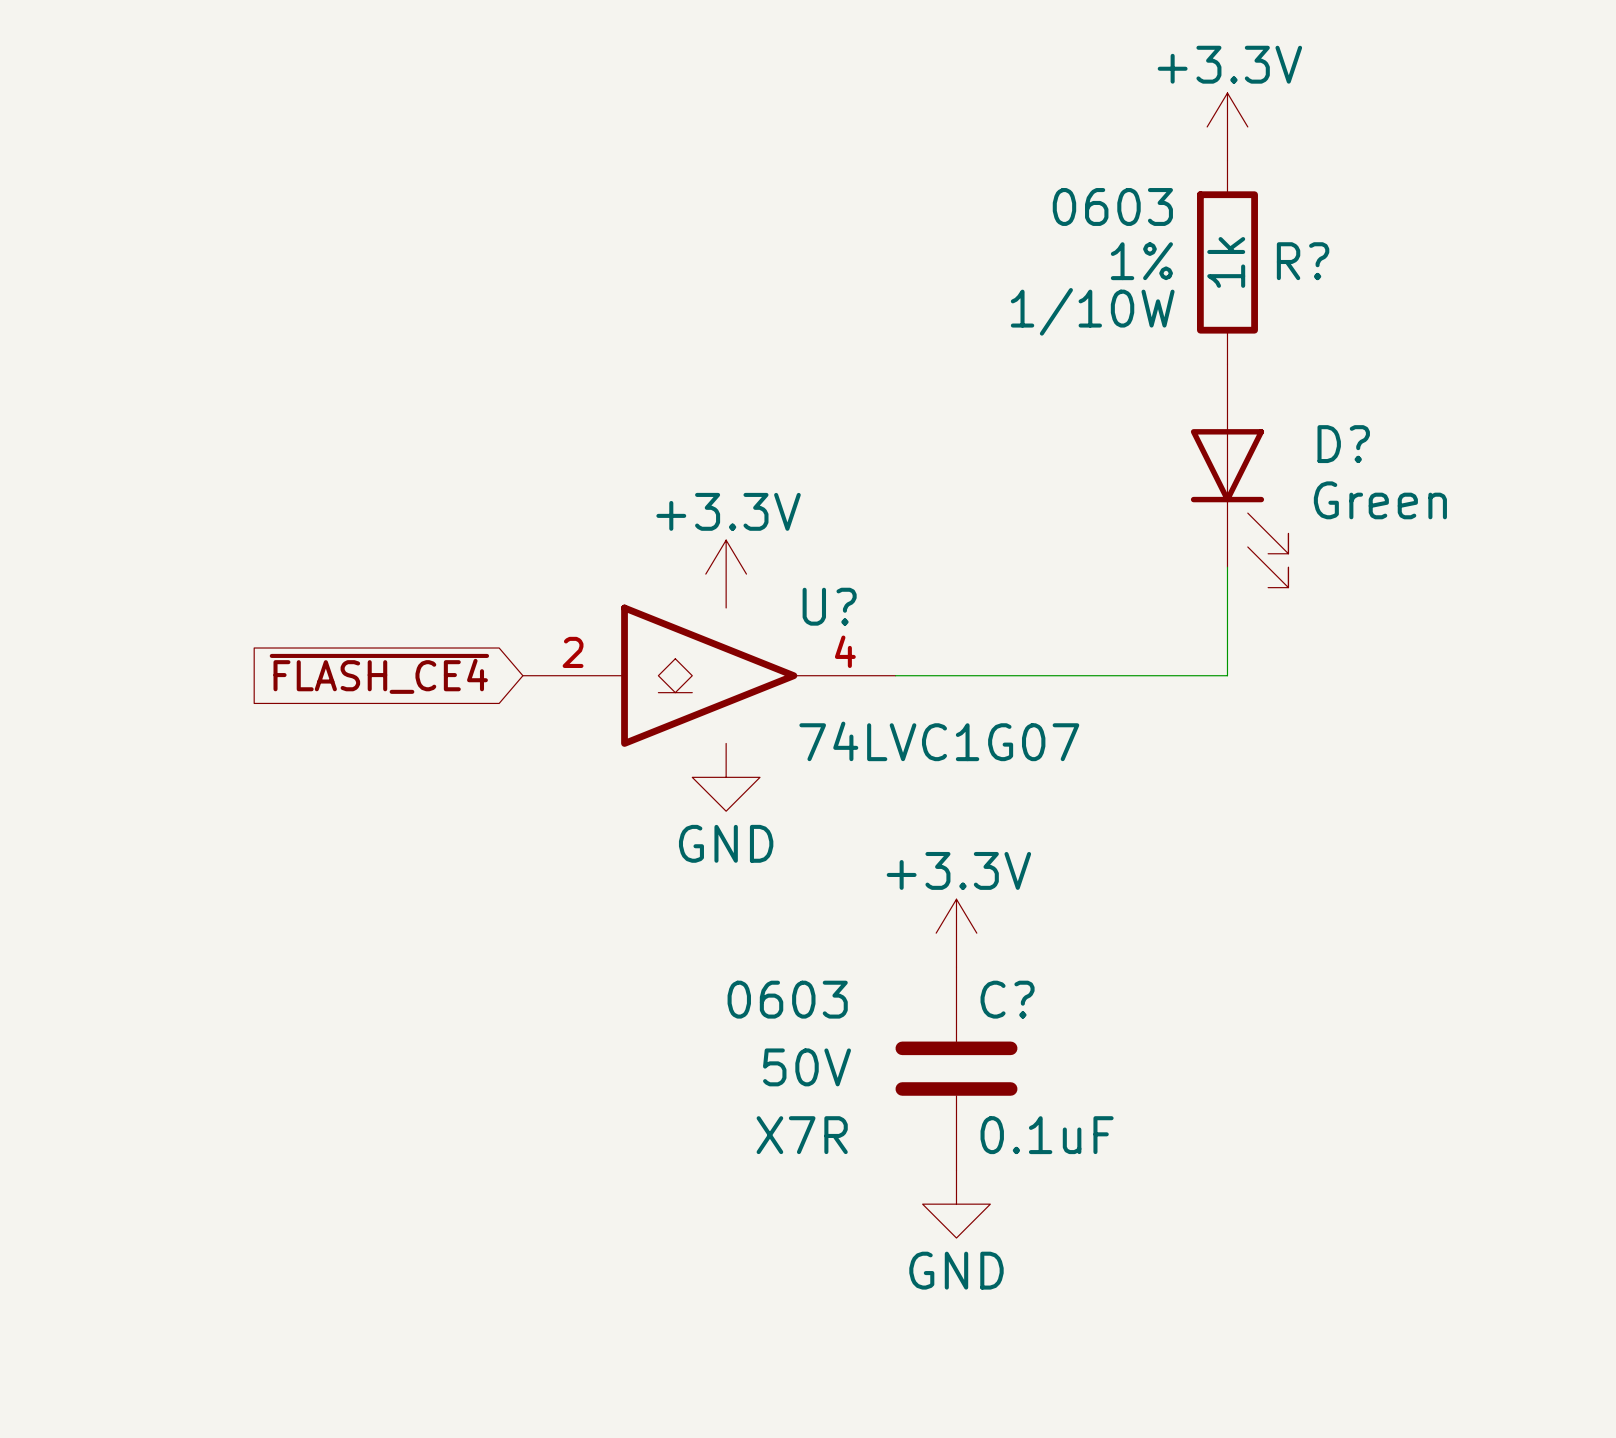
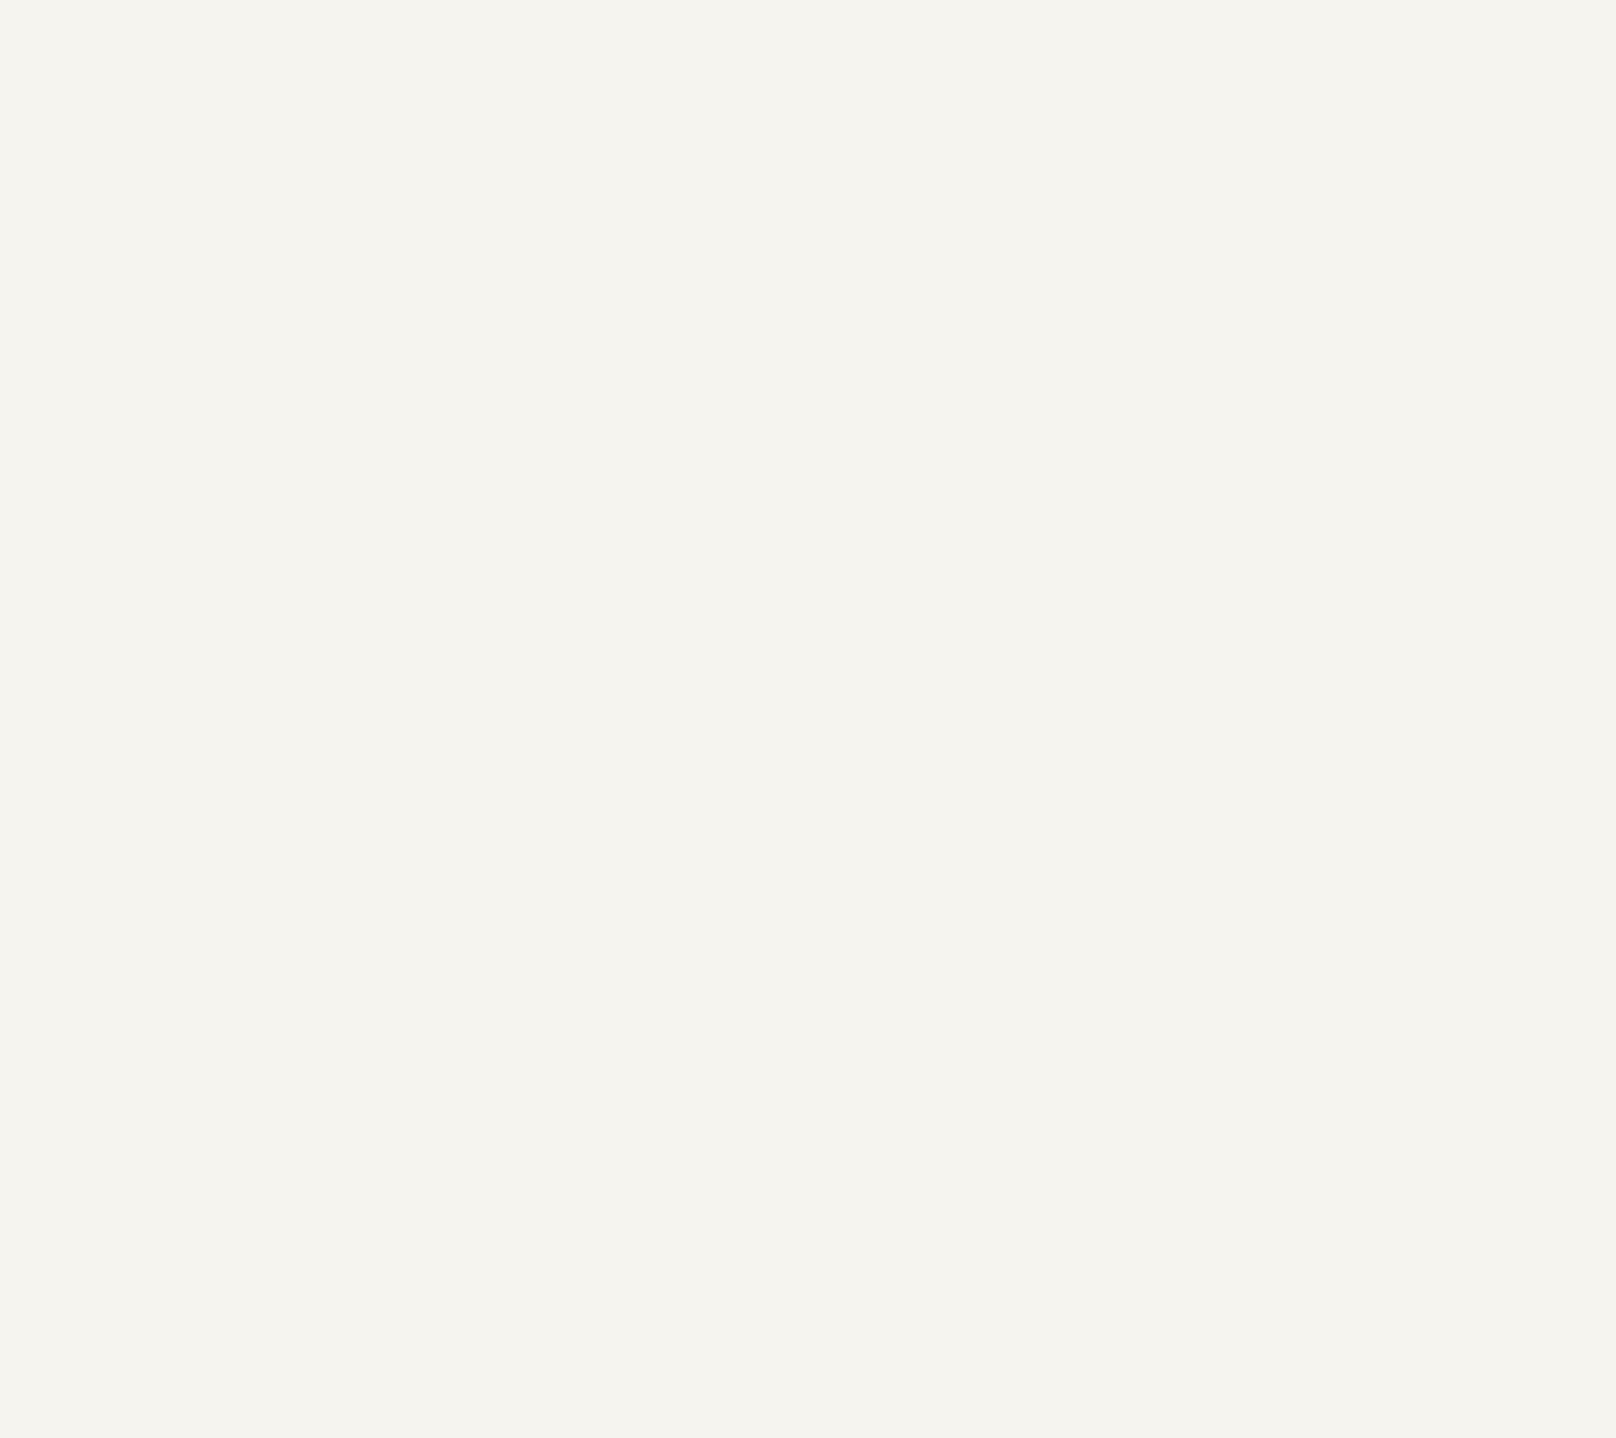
power symbol: +3.3V (1227, 126) -> none
R?: 1k (1227, 262) -> none
D?: Green (1239, 475) -> none
wire: (1227, 567) (1227, 675) (895, 675) -> none
power symbol: +3.3V (726, 574) -> none
global label: ~{FLASH_CE4} (379, 673) -> none
U?: 74LVC1G07 (709, 675) -> none
power symbol: GND (726, 777) -> none
power symbol: +3.3V (956, 933) -> none
C?: 0.1uF (956, 1068) -> none
power symbol: GND (956, 1204) -> none

